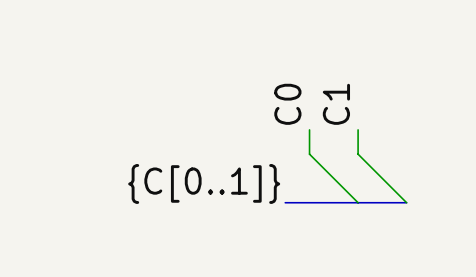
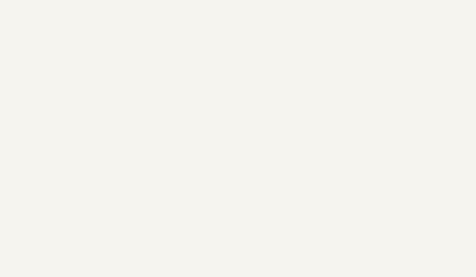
label: C0 (287, 104) -> none
label: C1 (336, 104) -> none
wire: (309, 129) (309, 154) (358, 202) -> none
wire: (358, 129) (358, 154) (406, 202) -> none
label: {C[0..1]} (204, 183) -> none
bus: (285, 202) (406, 202) -> none

